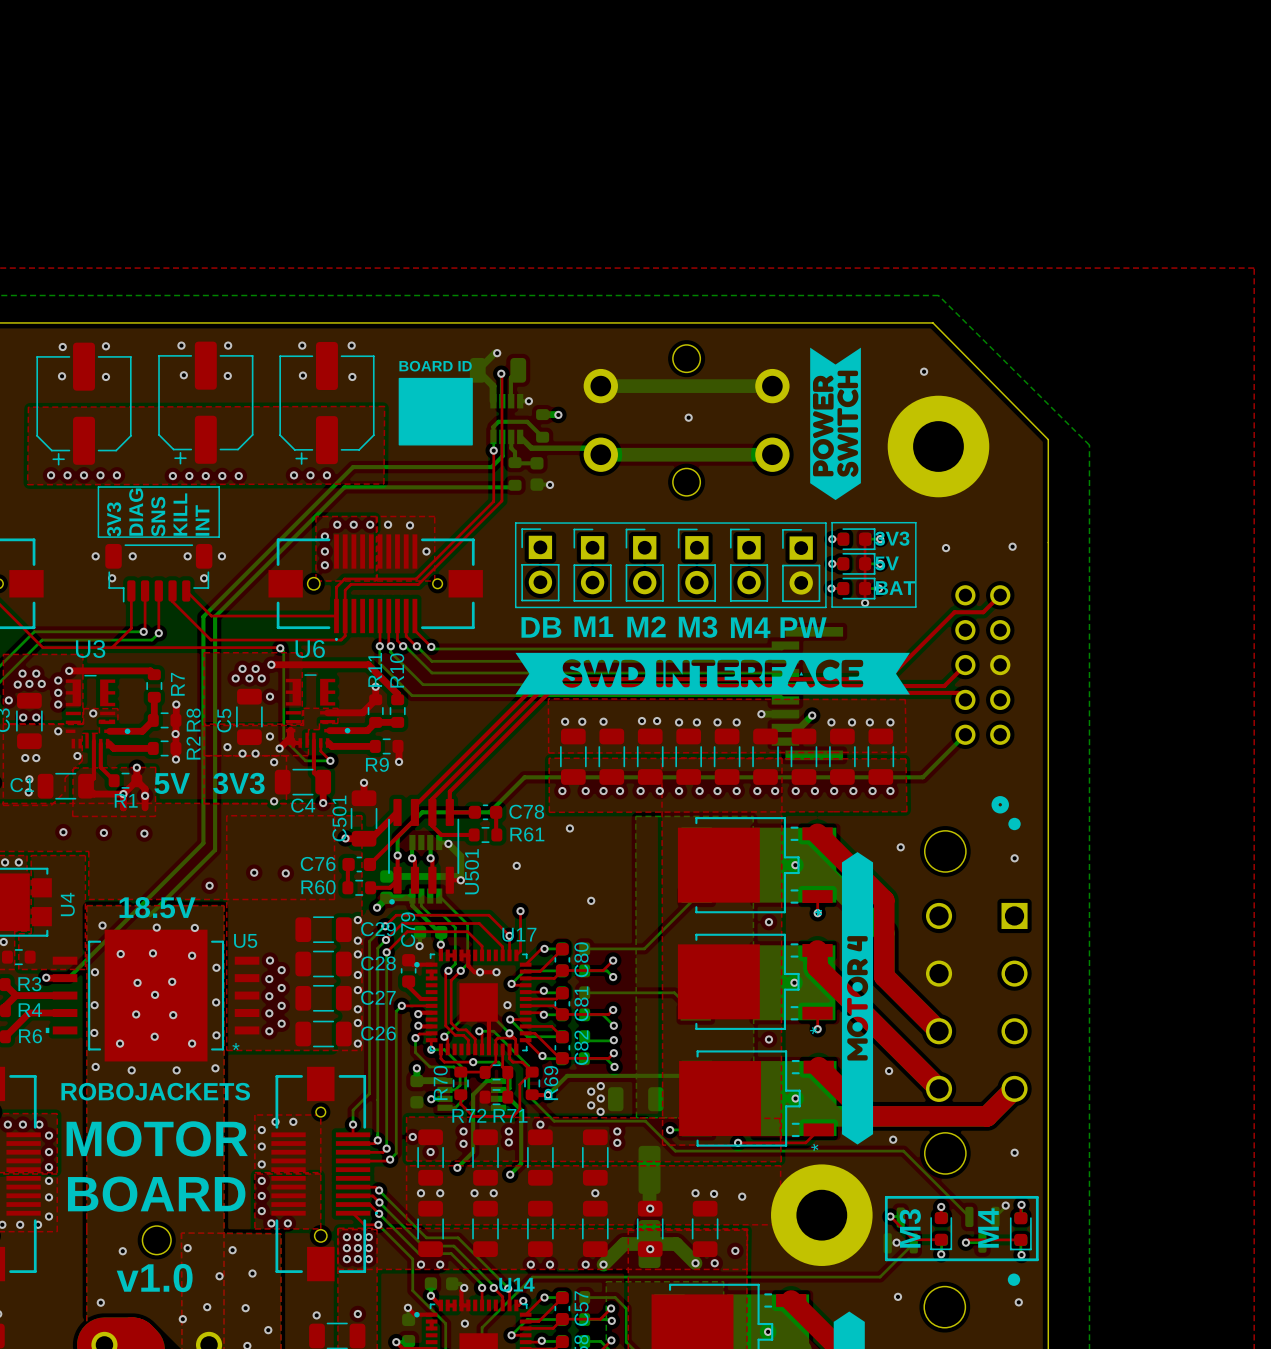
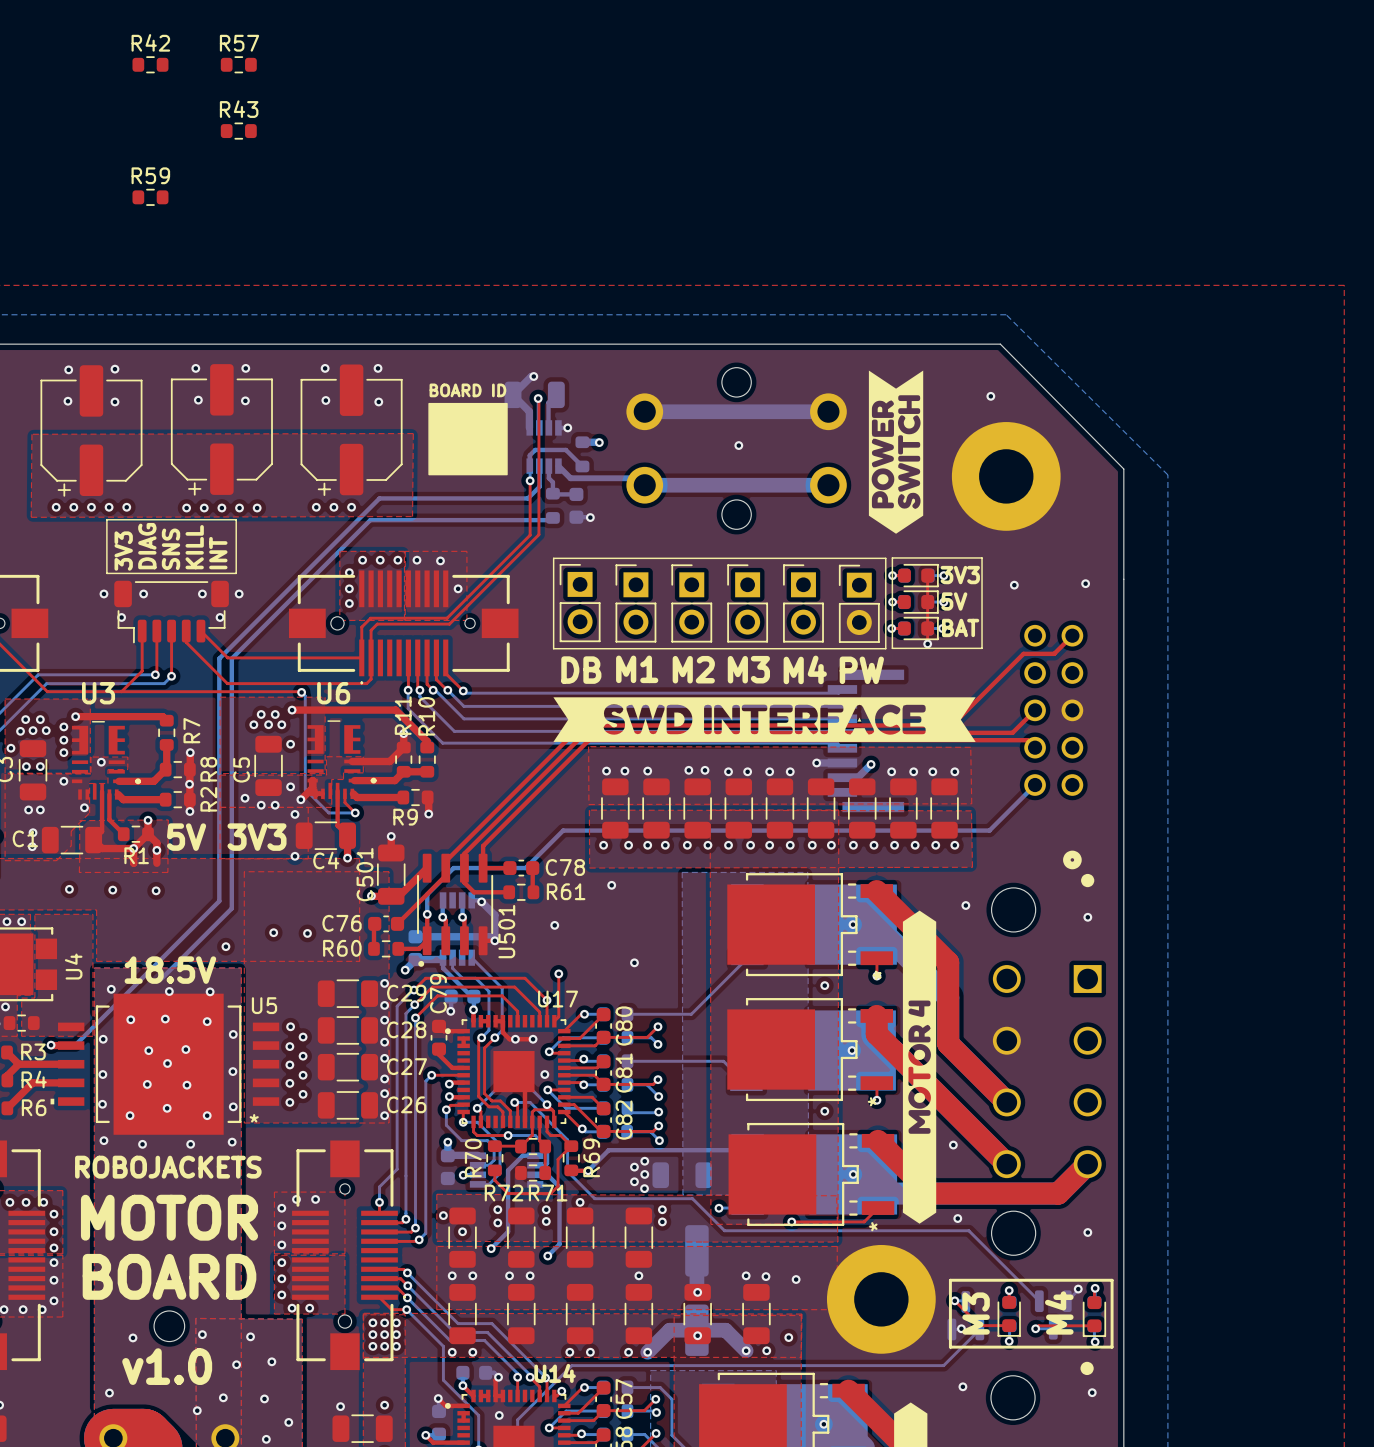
R42: none -> (150, 64)
R57: none -> (238, 64)
R43: none -> (238, 131)
R59: none -> (150, 197)

